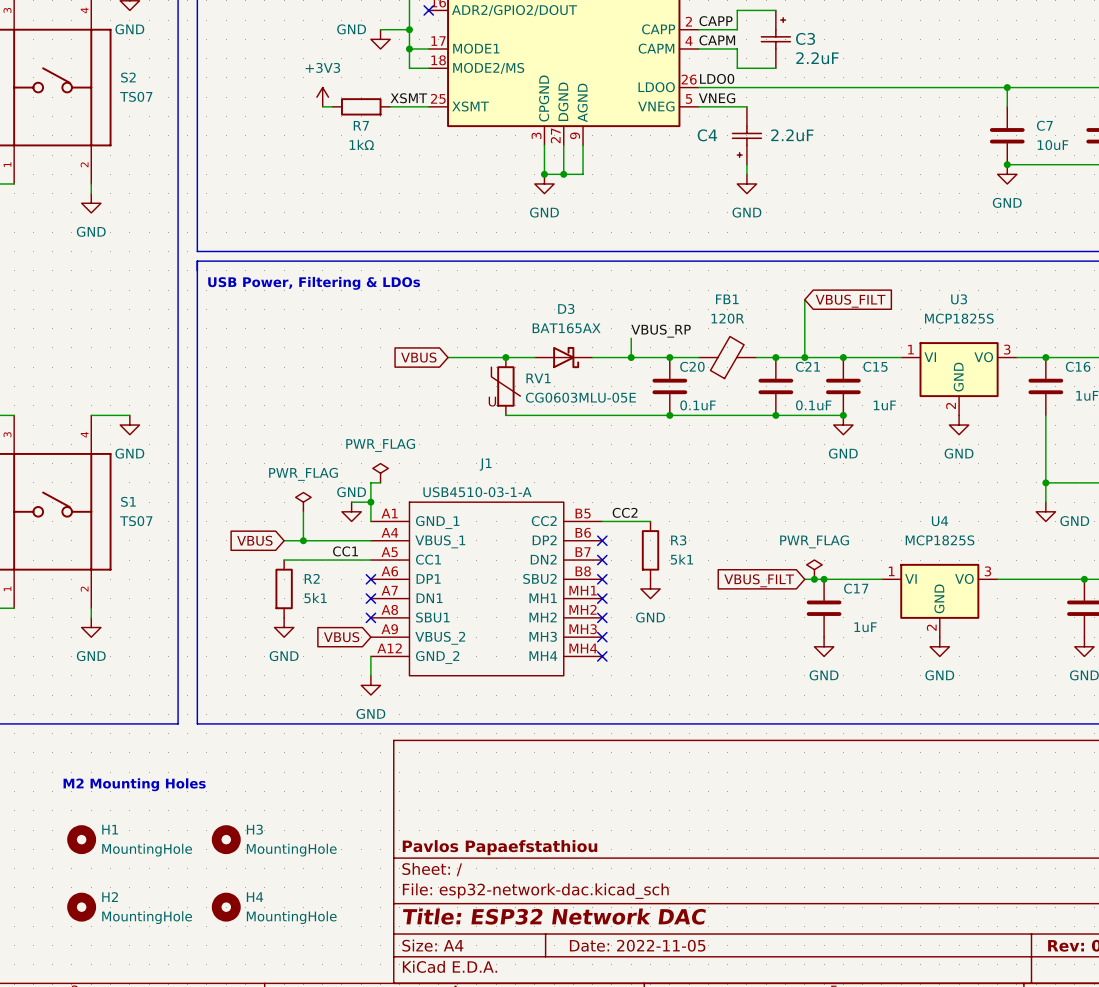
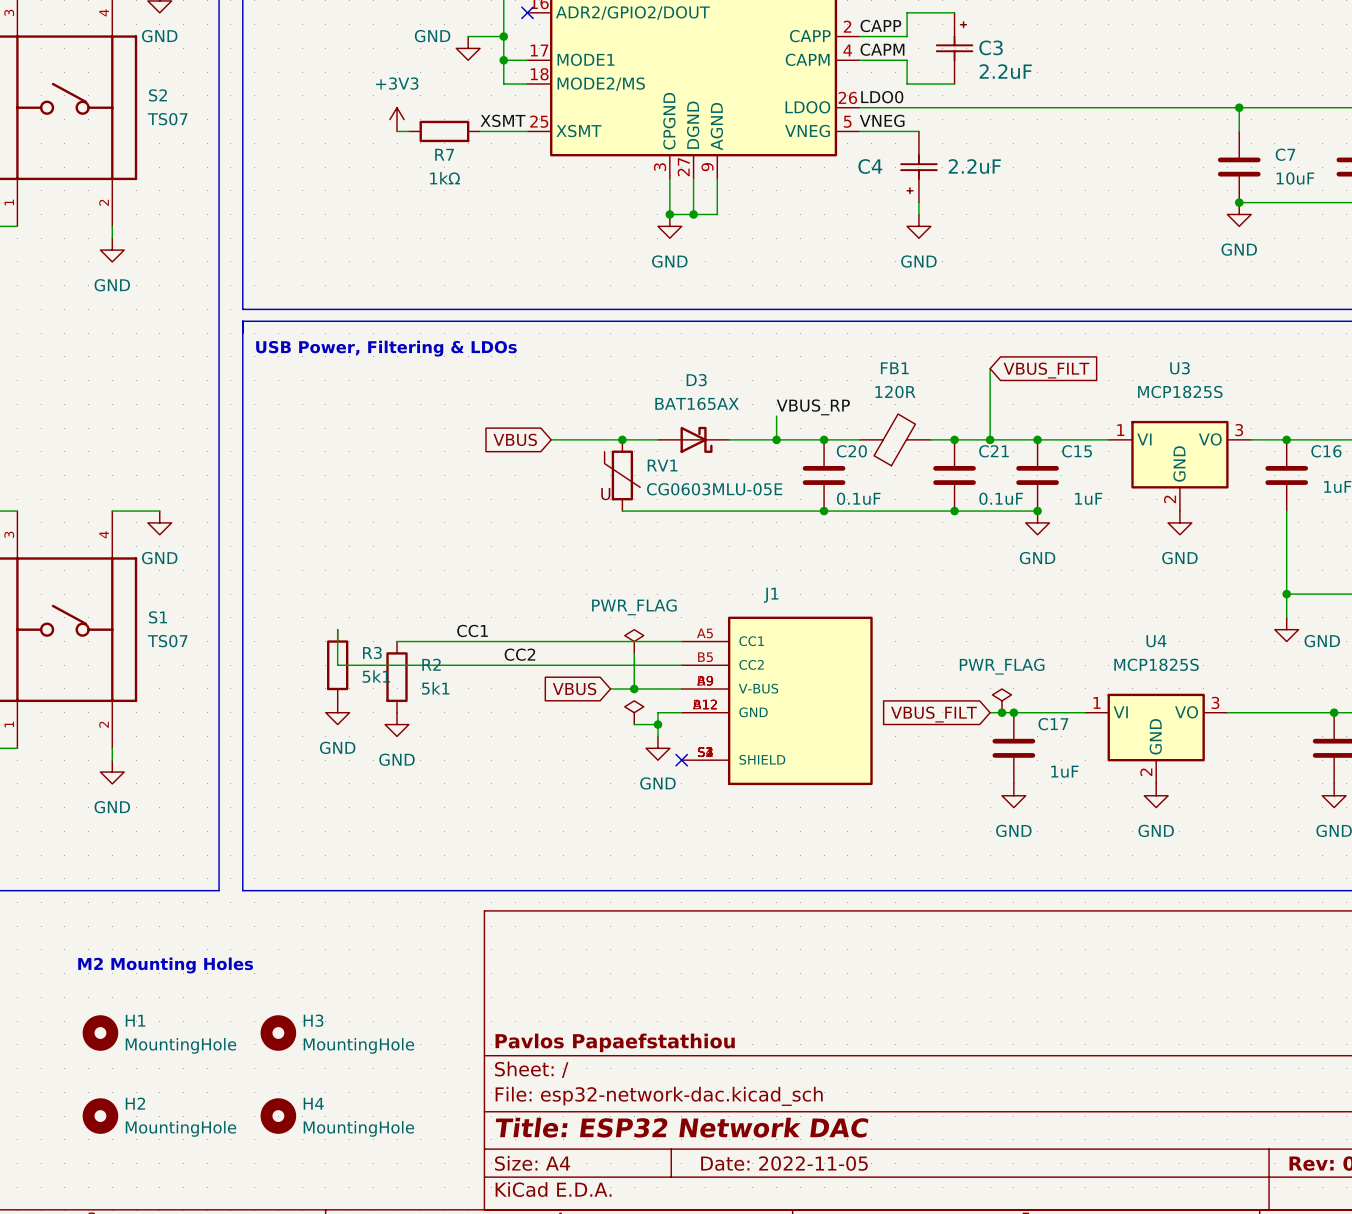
J1 name position: J1 (485, 464) -> J1 (771, 595)
power symbol: PWR_FLAG (380, 473) -> none
wire: (380, 482) (370, 482) (370, 521) -> none
J1 value: USB4510-03-1-A (477, 492) -> none
J1 symbol: [370, 501, 603, 677] -> [681, 616, 873, 786]
power symbol: PWR_FLAG (303, 502) -> none
wire: (351, 502) (370, 502) -> (634, 724) (657, 724)
junction: (370, 502) -> none
wire: none -> (337, 629) (337, 665) (349, 665)
wire: (303, 511) (303, 540) -> none
power symbol: GND (351, 511) -> none
label: CC2 (625, 512) -> none
wire: none -> (397, 641) (681, 641)
power symbol: none -> PWR_FLAG (634, 641)
wire: none -> (634, 653) (634, 688)
label: none -> CC2 (519, 654)
global label: VBUS (254, 540) -> none
junction: (303, 540) -> none
wire: none -> (456, 665) (681, 665)
no-connect mark: (602, 540) -> none
R3 position: (650, 550) -> (337, 665)
label position: CC1 (345, 551) -> CC1 (472, 630)
wire: (284, 560) (370, 560) -> none
global label: none -> VBUS (574, 689)
wire: none -> (610, 688) (681, 688)
junction: none -> (634, 688)
no-connect mark: (602, 560) -> none
power symbol: none -> GND (337, 712)
no-connect mark: (370, 579) -> none
power symbol: none -> (634, 712)
wire: none -> (681, 712) (657, 712) (657, 736)
no-connect mark: (602, 579) -> none
R2 position: (284, 588) -> (397, 677)
power symbol: none -> GND (397, 724)
junction: none -> (657, 724)
power symbol: GND (650, 588) -> none
no-connect mark: (370, 598) -> none
no-connect mark: (602, 598) -> none
power symbol: none -> GND (657, 748)
no-connect mark: (370, 617) -> none
no-connect mark: none -> (681, 760)
no-connect mark: (602, 617) -> none
power symbol: GND (284, 627) -> none
global label: VBUS (341, 637) -> none
no-connect mark: (602, 637) -> none
wire: (370, 656) (370, 675) -> none
no-connect mark: (602, 656) -> none
power symbol: GND (370, 685) -> none

